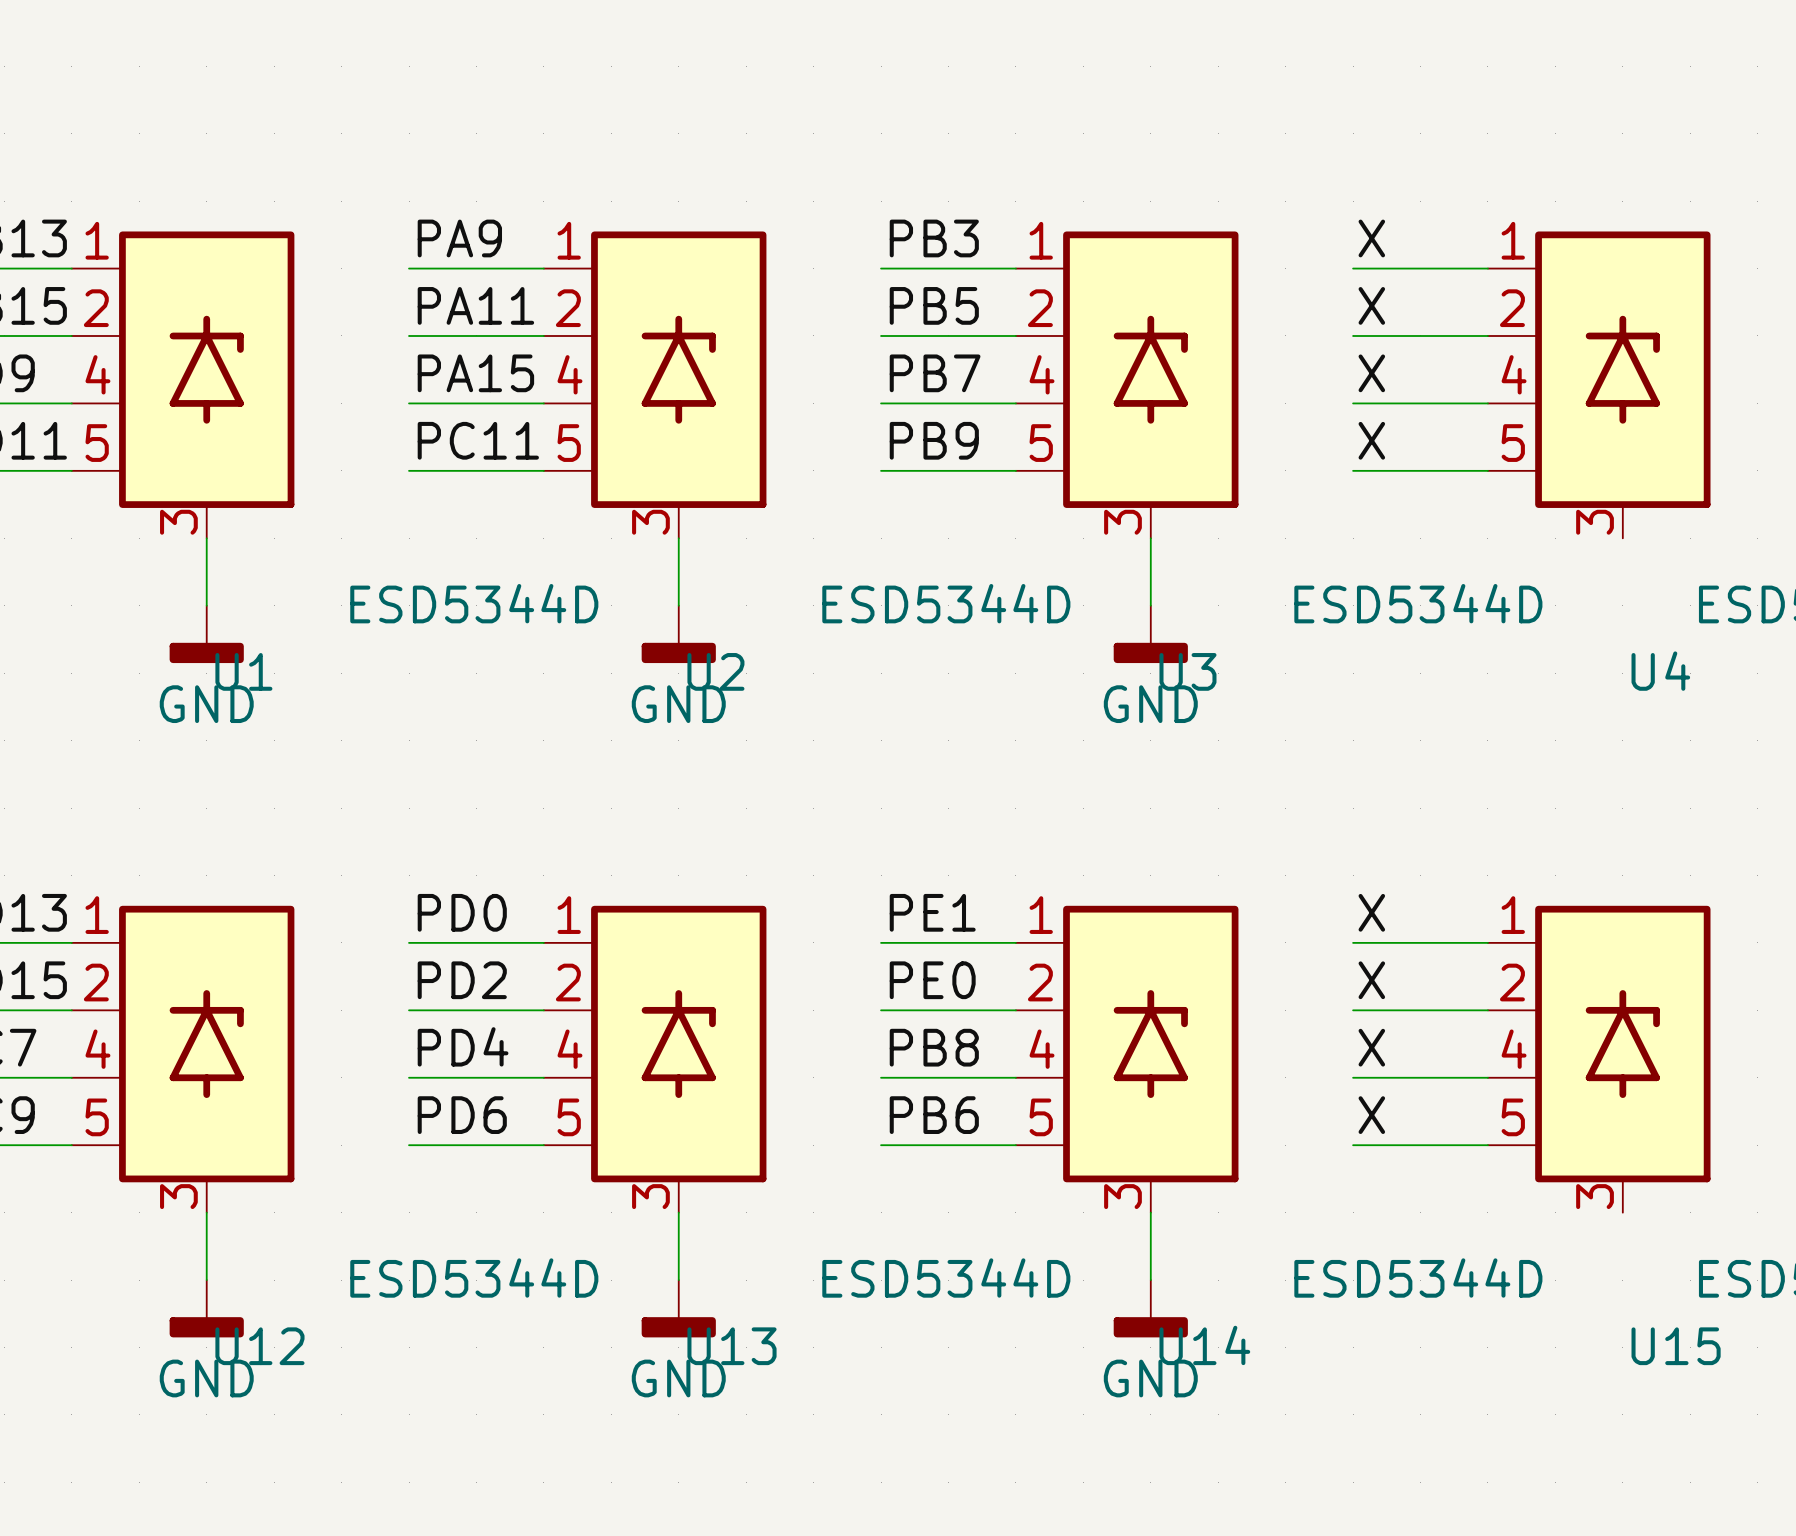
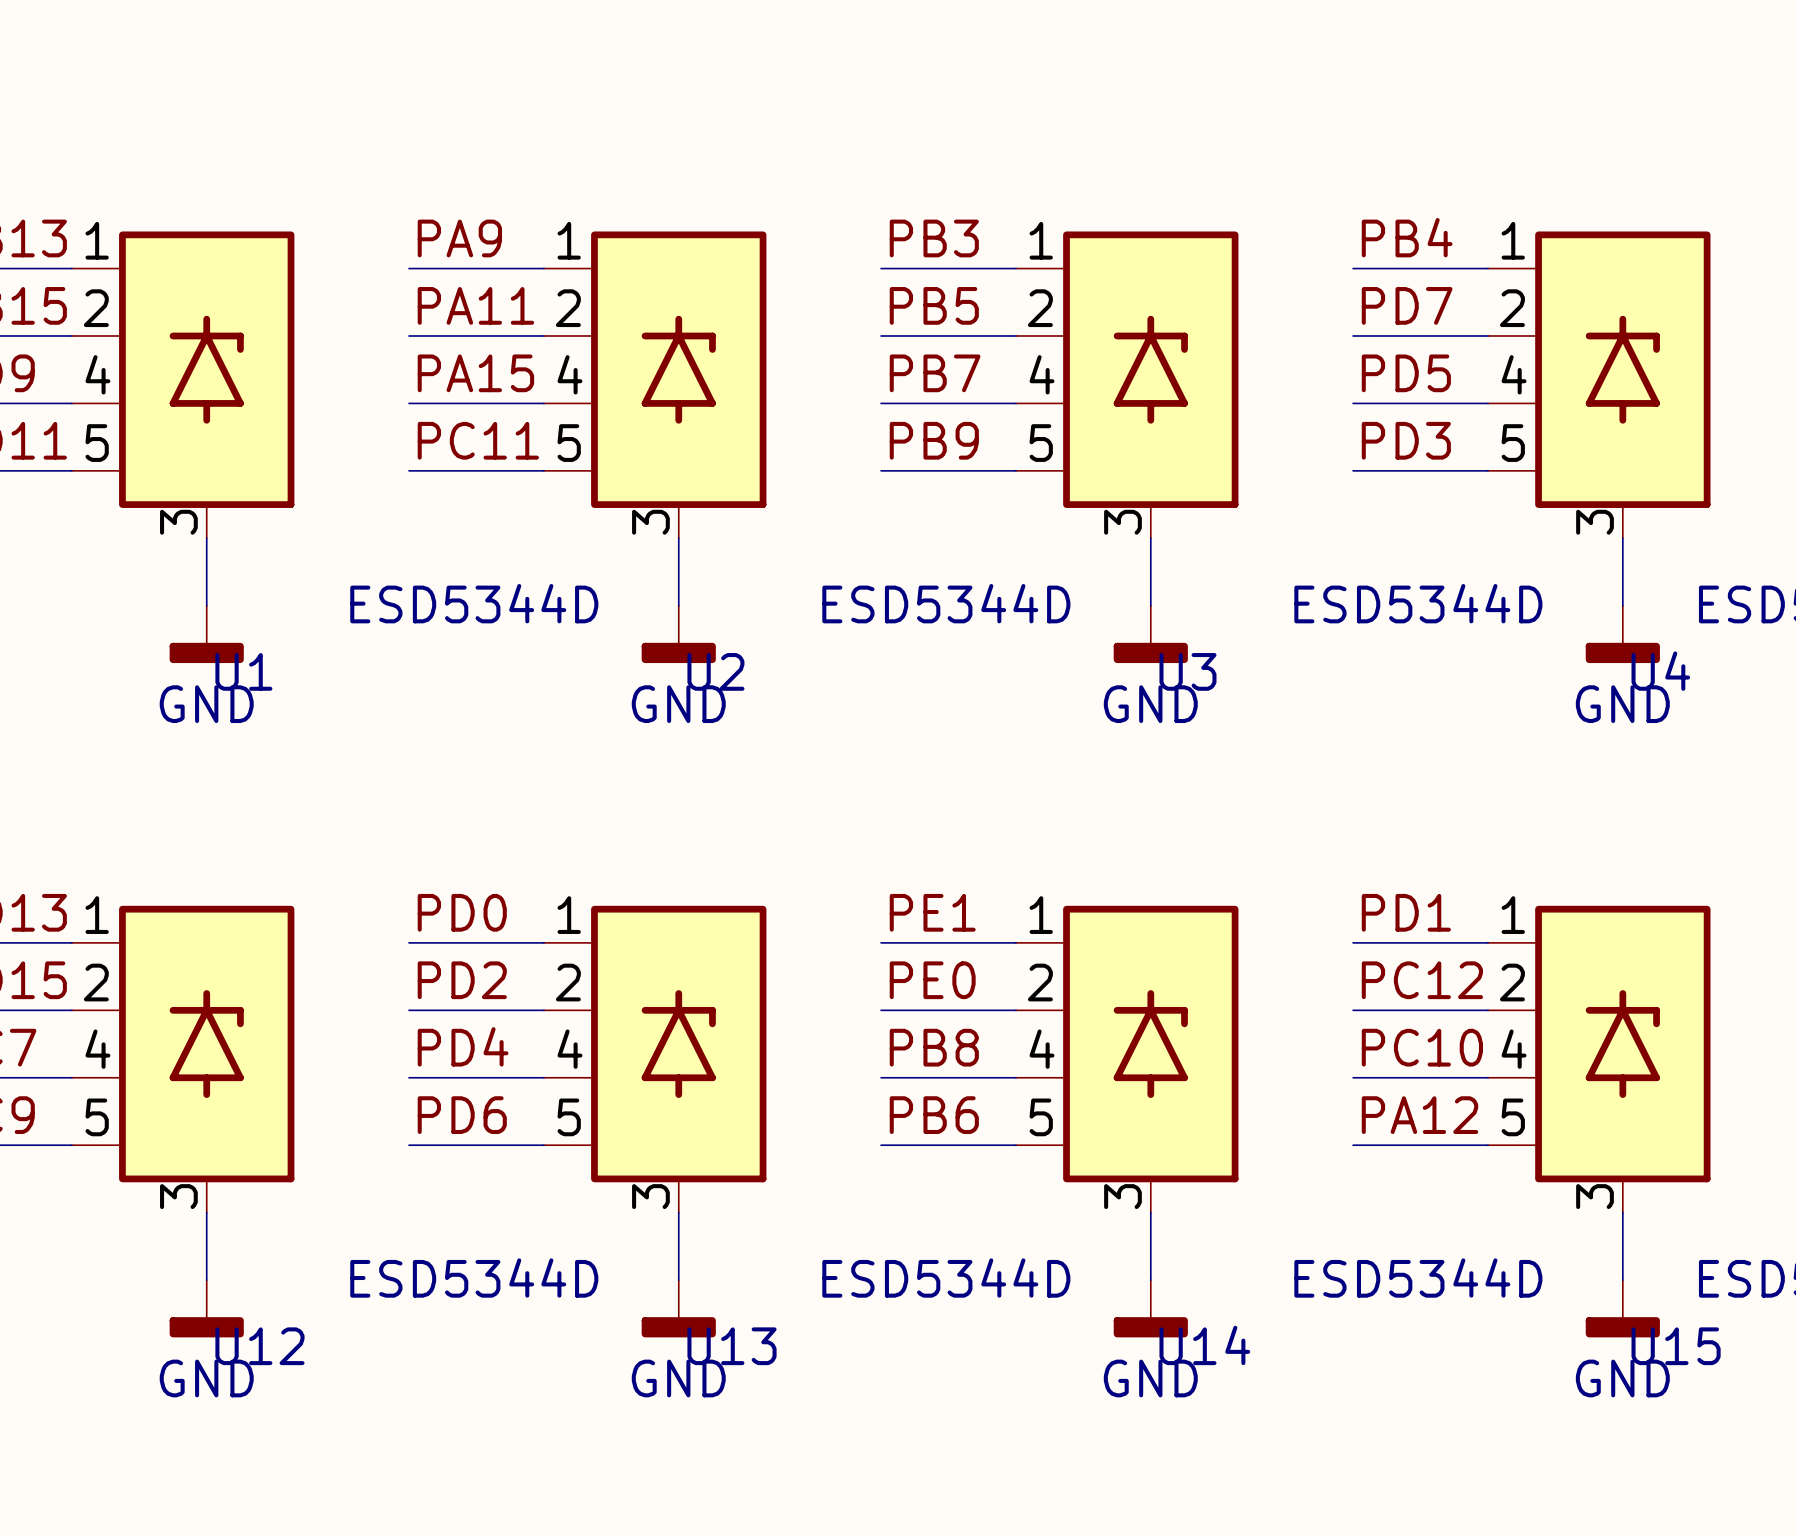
label: X (1371, 238) -> PB4 (1407, 237)
label: X (1371, 305) -> PD7 (1407, 305)
label: X (1371, 373) -> PD5 (1406, 373)
label: X (1371, 440) -> PD3 (1406, 440)
wire: none -> (1622, 538) (1622, 605)
power symbol: none -> GND (1622, 634)
label: X (1371, 912) -> PD1 (1406, 912)
label: X (1371, 980) -> PC12 (1422, 980)
label: X (1371, 1047) -> PC10 (1422, 1047)
label: X (1371, 1115) -> PA12 (1419, 1115)
wire: none -> (1622, 1212) (1622, 1280)
power symbol: none -> GND (1622, 1308)

